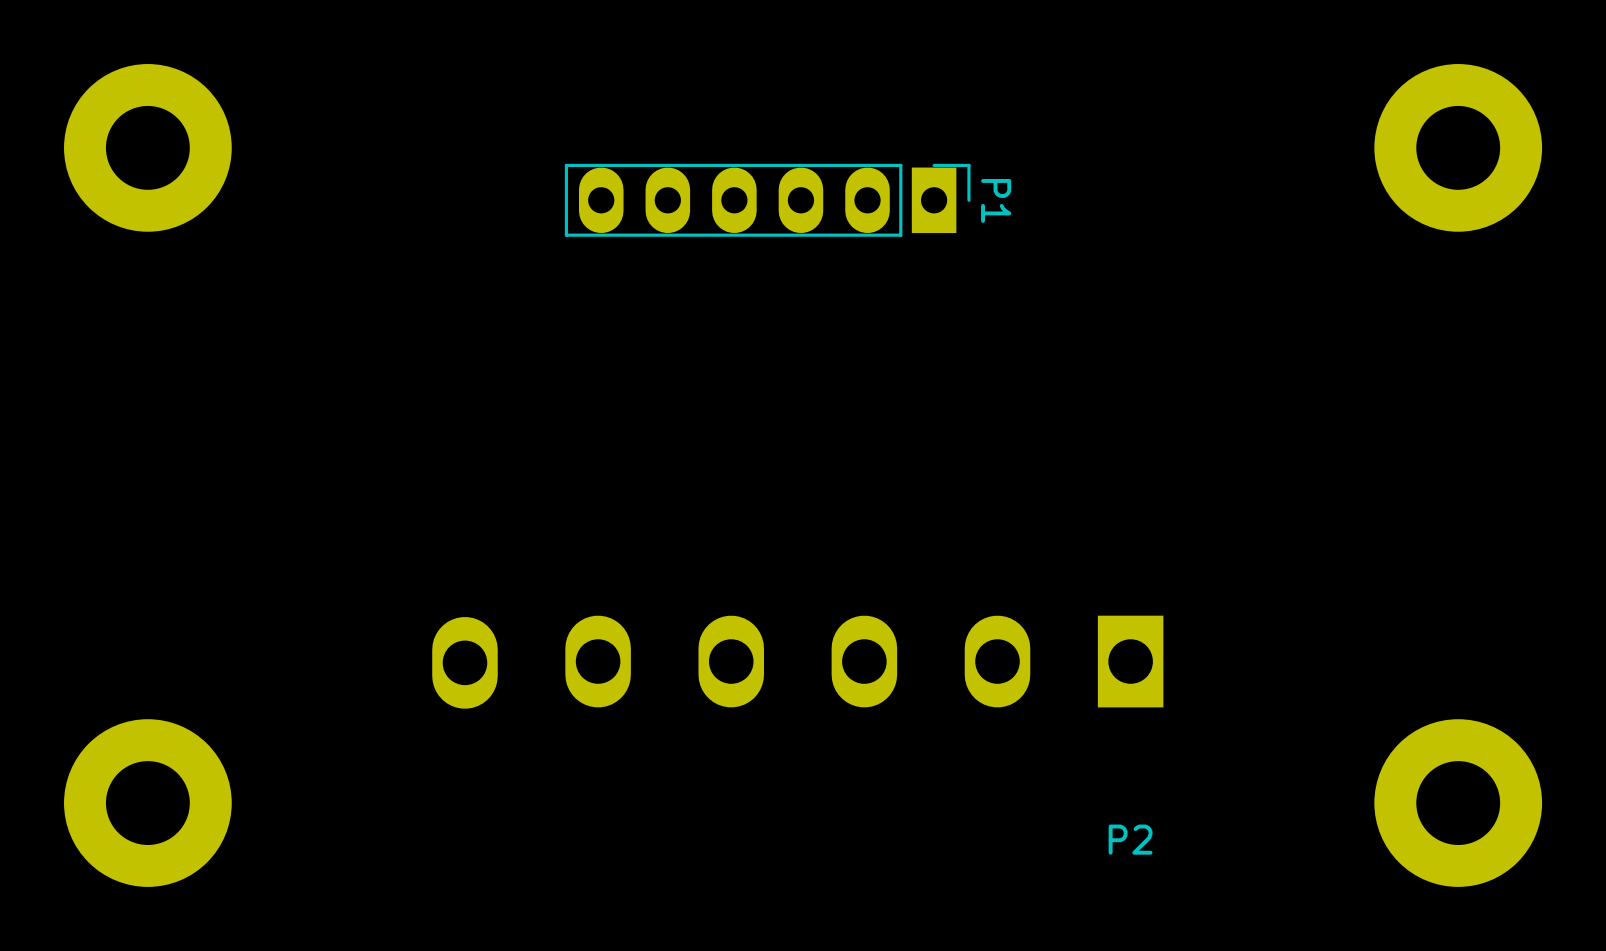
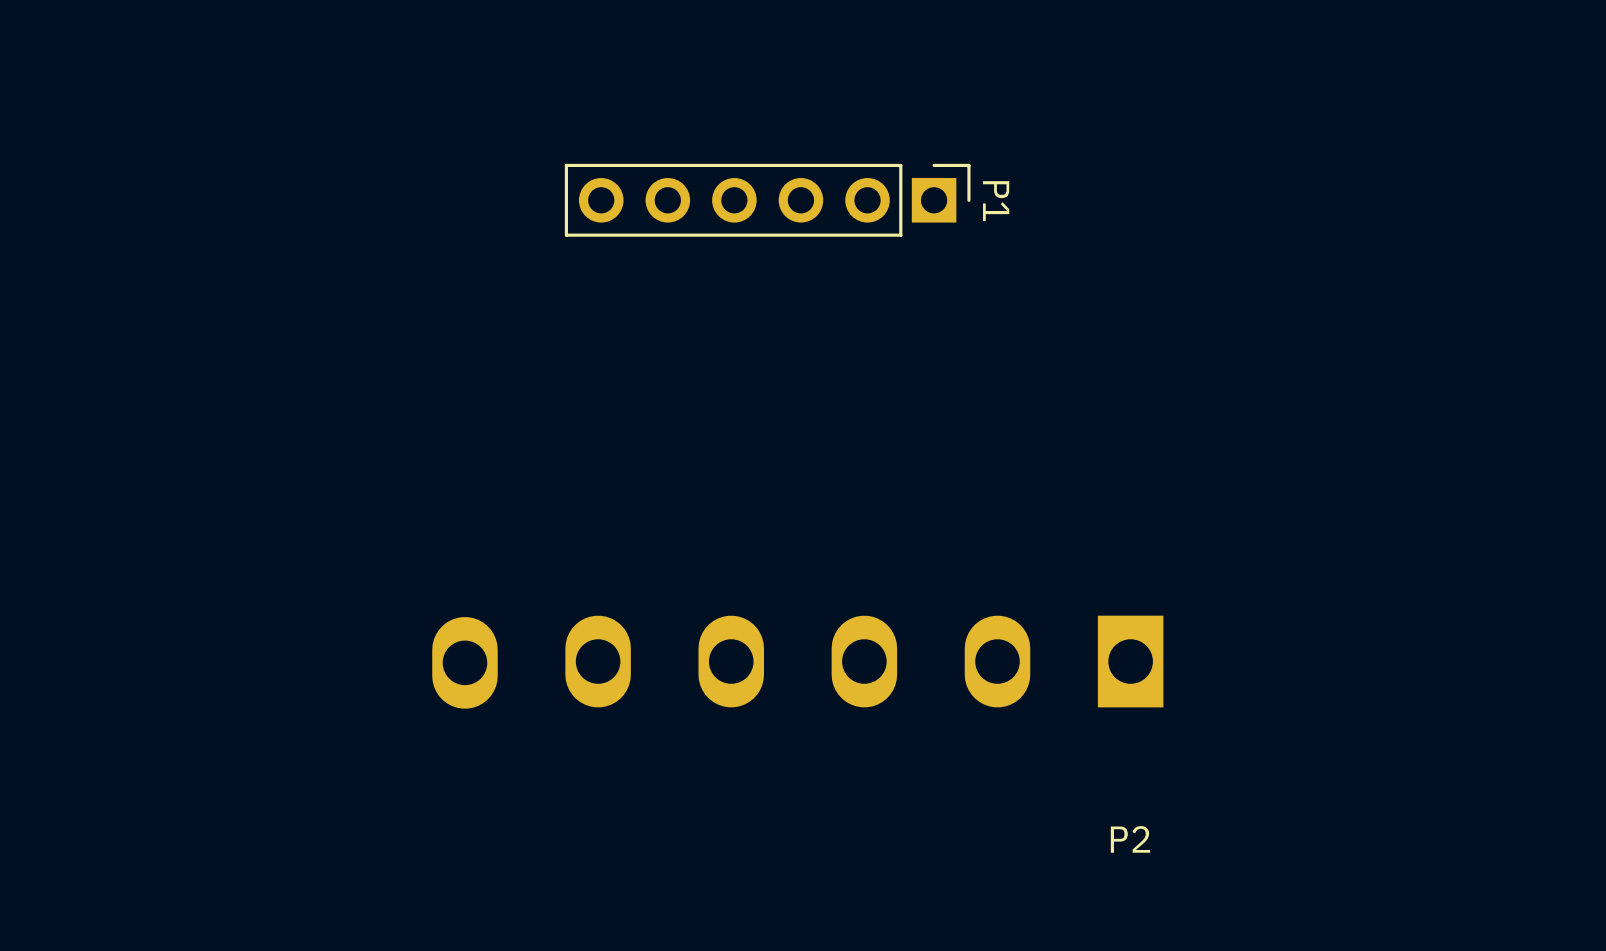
part: (147, 147) -> none
part: (1458, 147) -> none
P1 footprint: [564, 163, 971, 237] -> [564, 163, 971, 237]
part: (147, 803) -> none
part: (1458, 803) -> none

